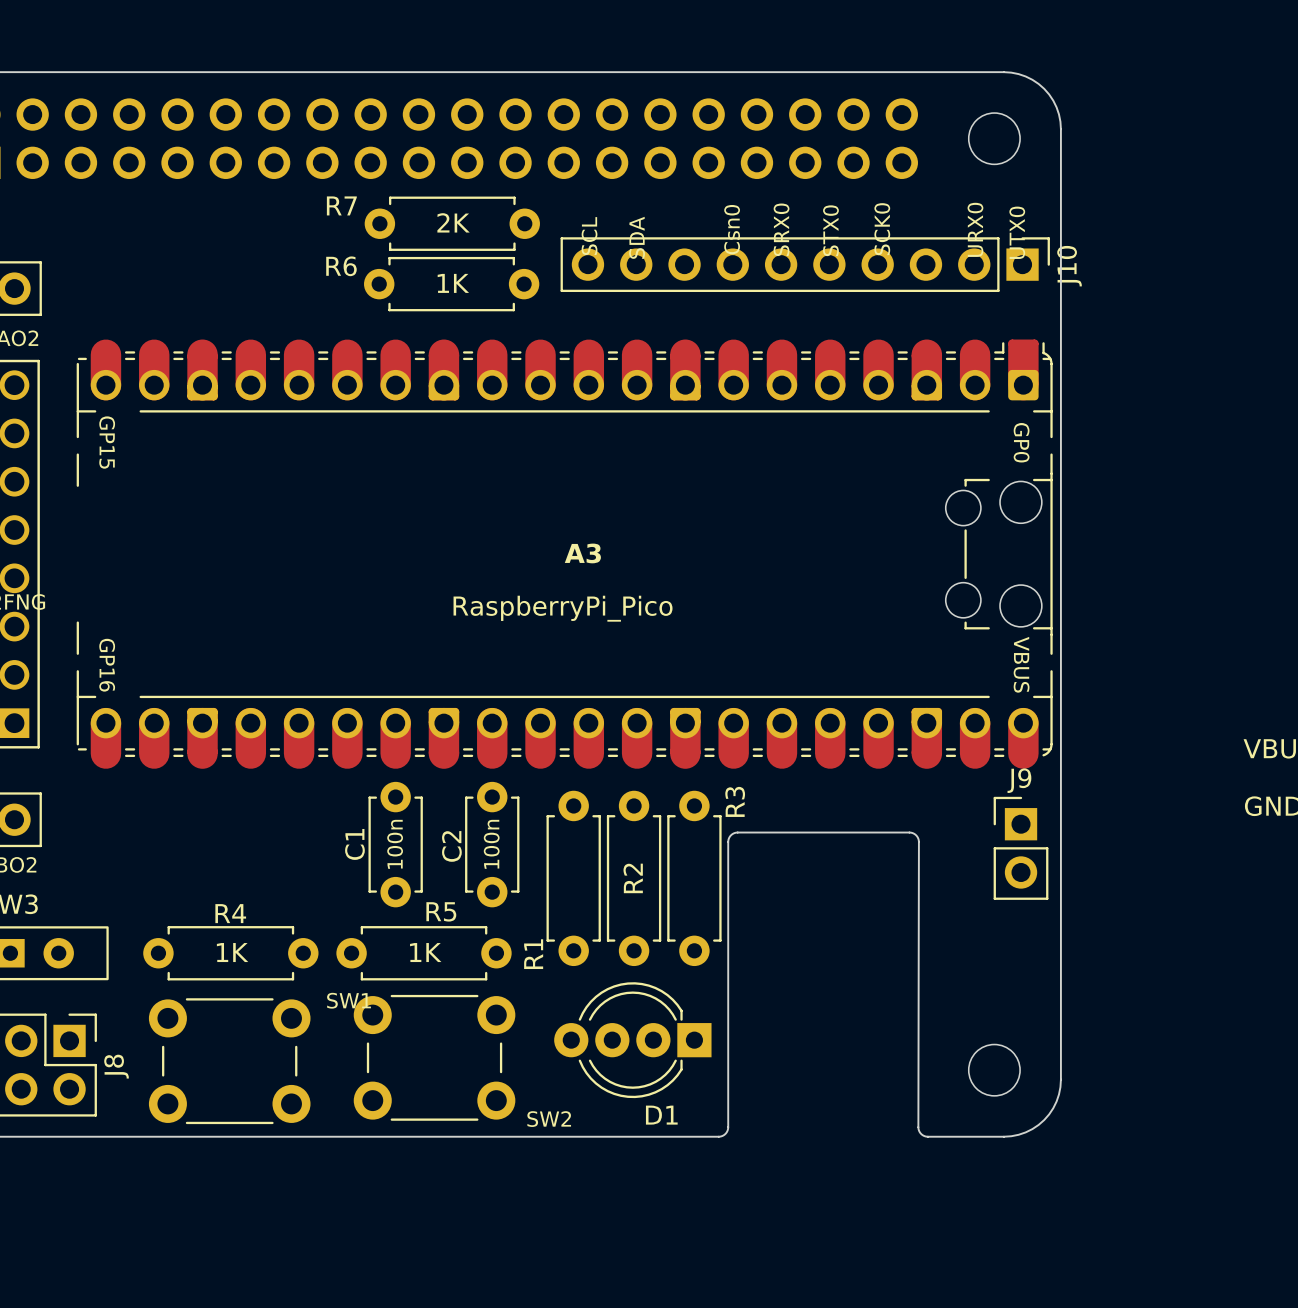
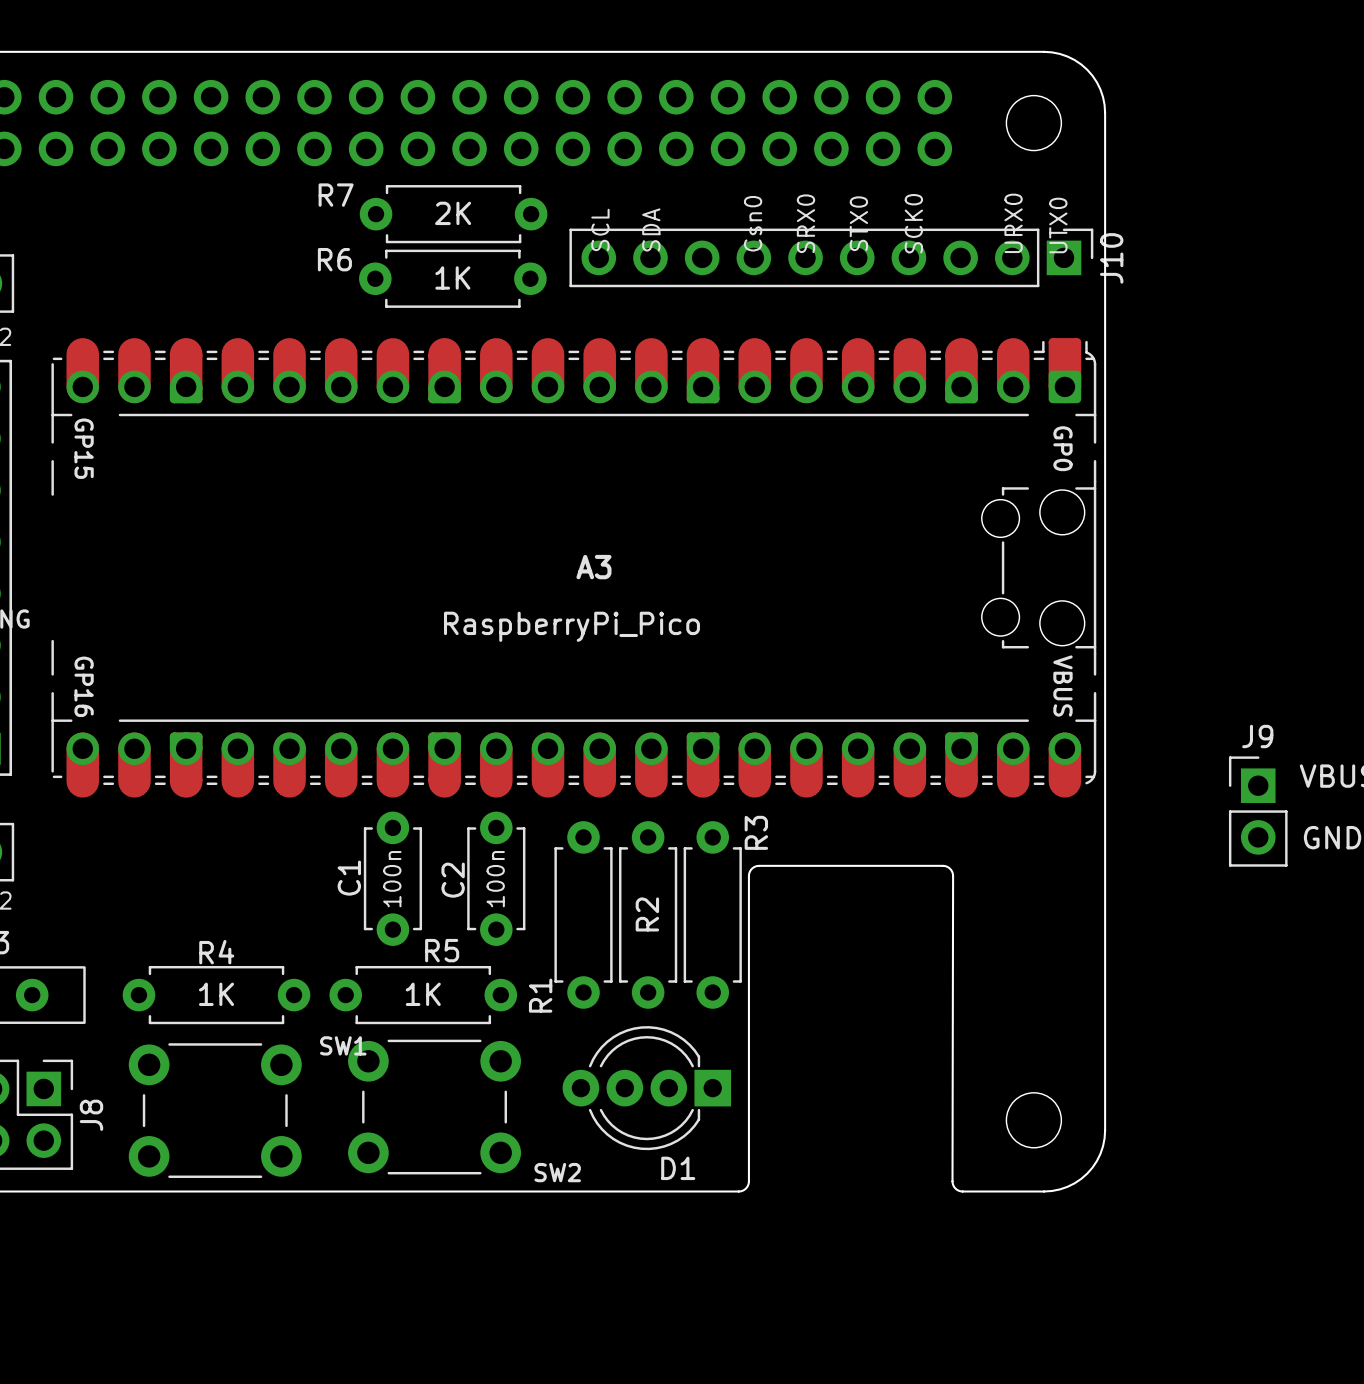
J9 position: (1021, 848) -> (1258, 811)

